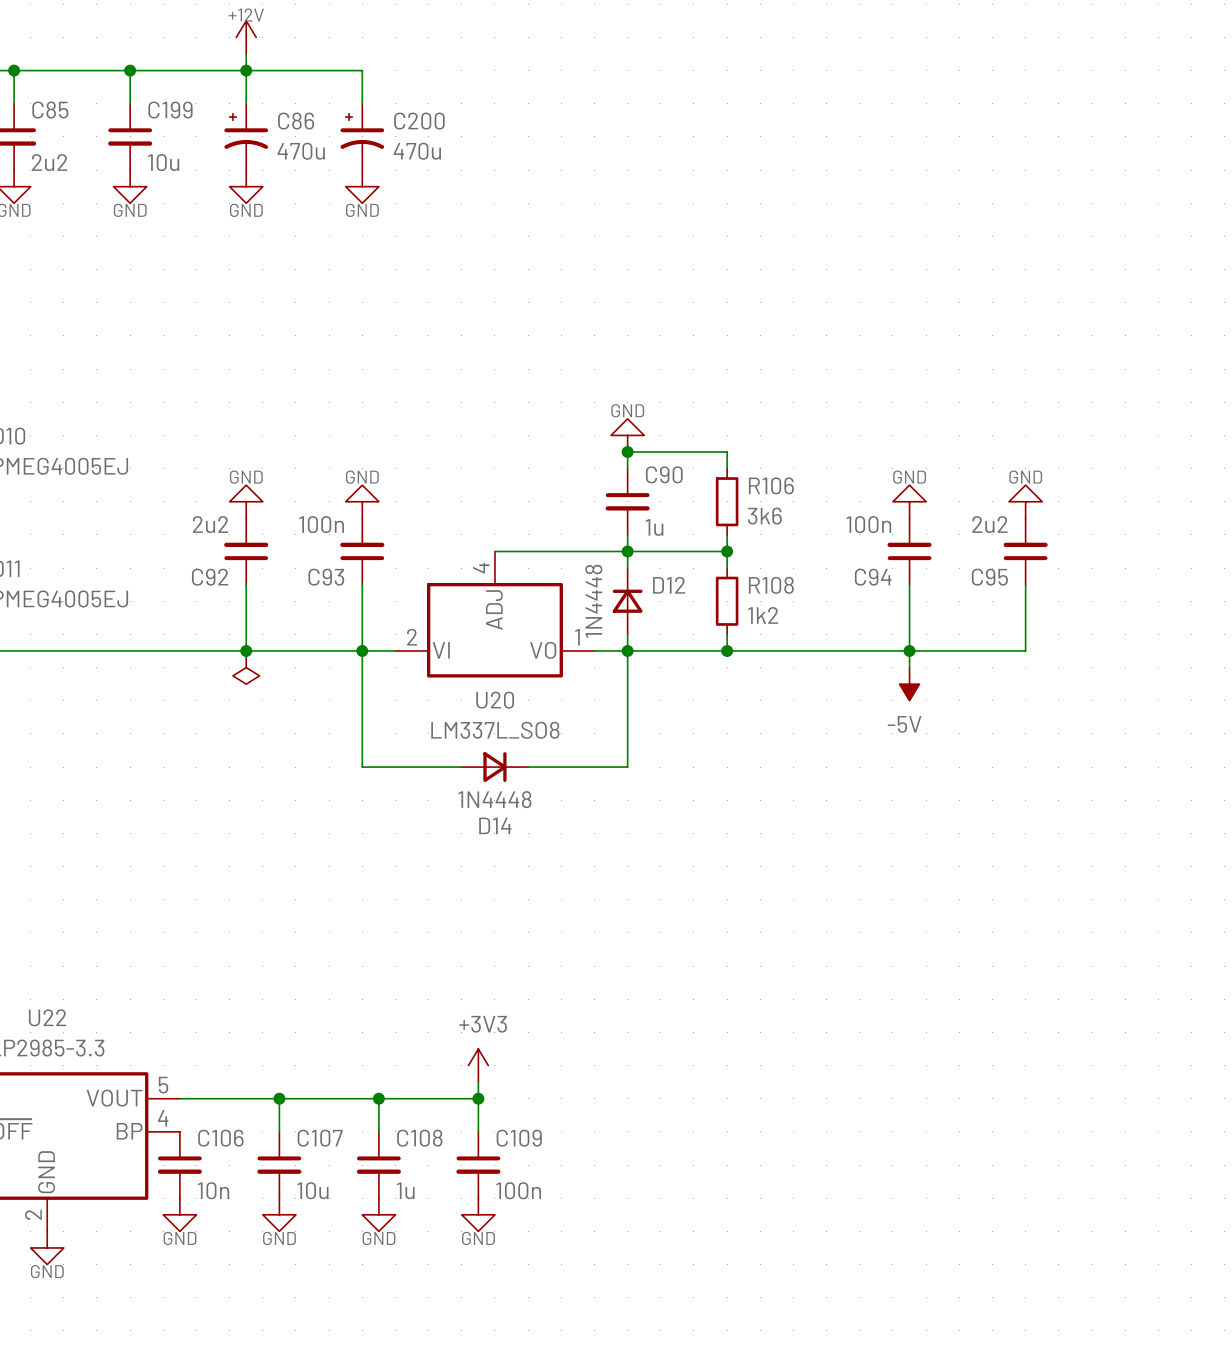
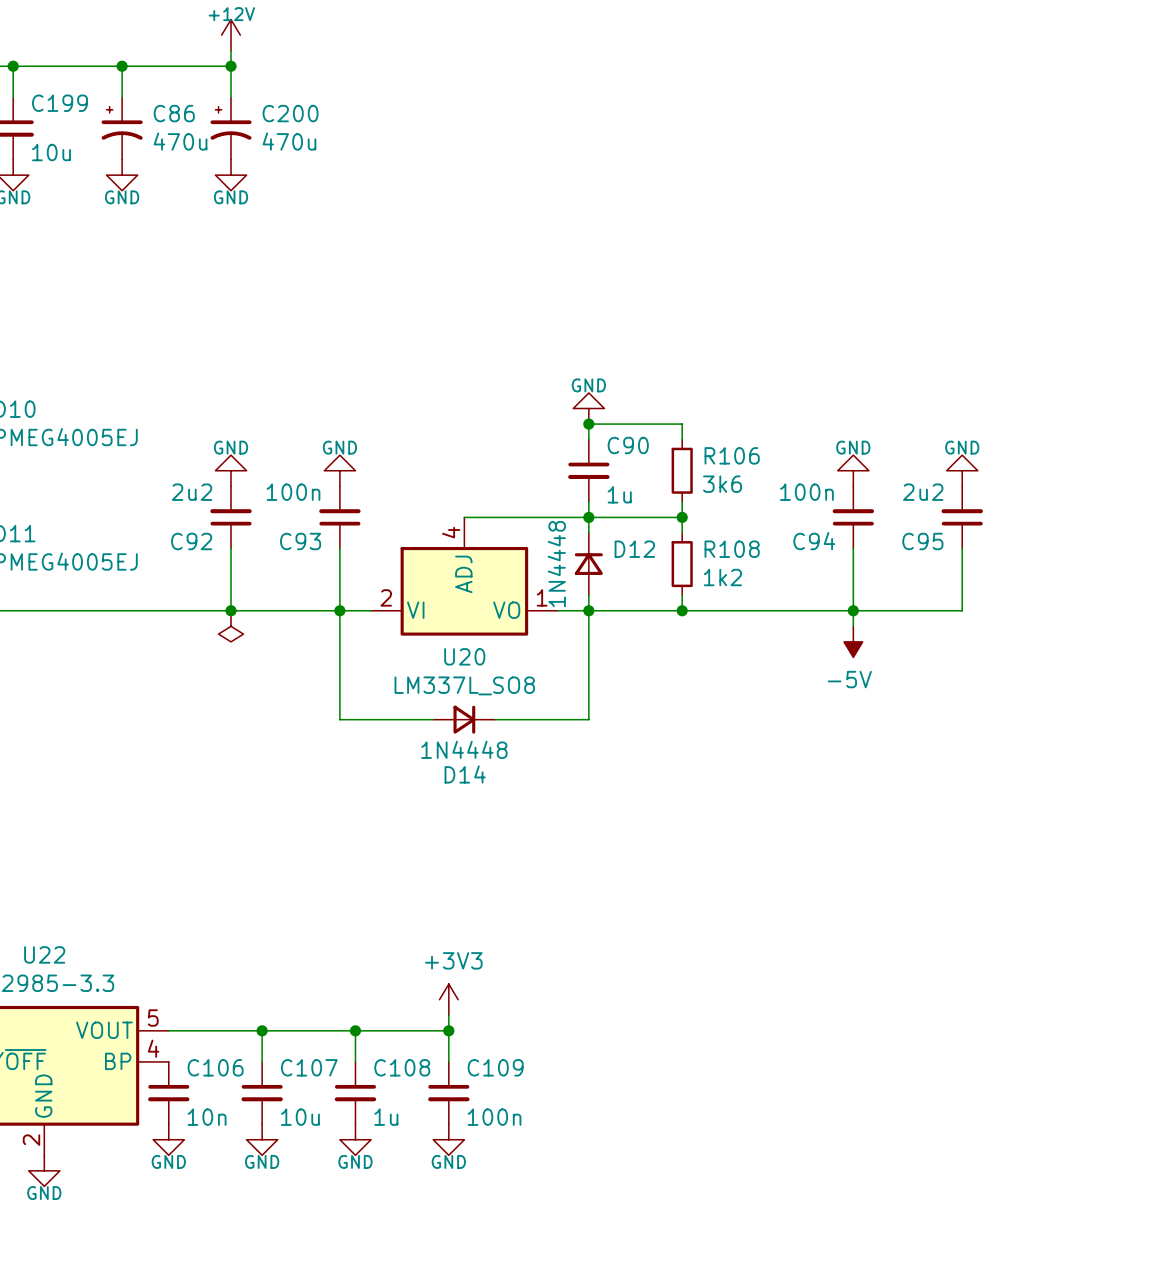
wire: (246, 70) (362, 70) (362, 103) -> none
C85 name: C85 (50, 110) -> C199 (59, 103)
C86 name: C86 (296, 121) -> C200 (290, 113)
C199: 10u (130, 136) -> none
C86: none -> 470u (122, 128)
C200: 470u (362, 136) -> none
C85 value: 2u2 (49, 162) -> 10u (51, 152)
power symbol: GND (362, 186) -> none

